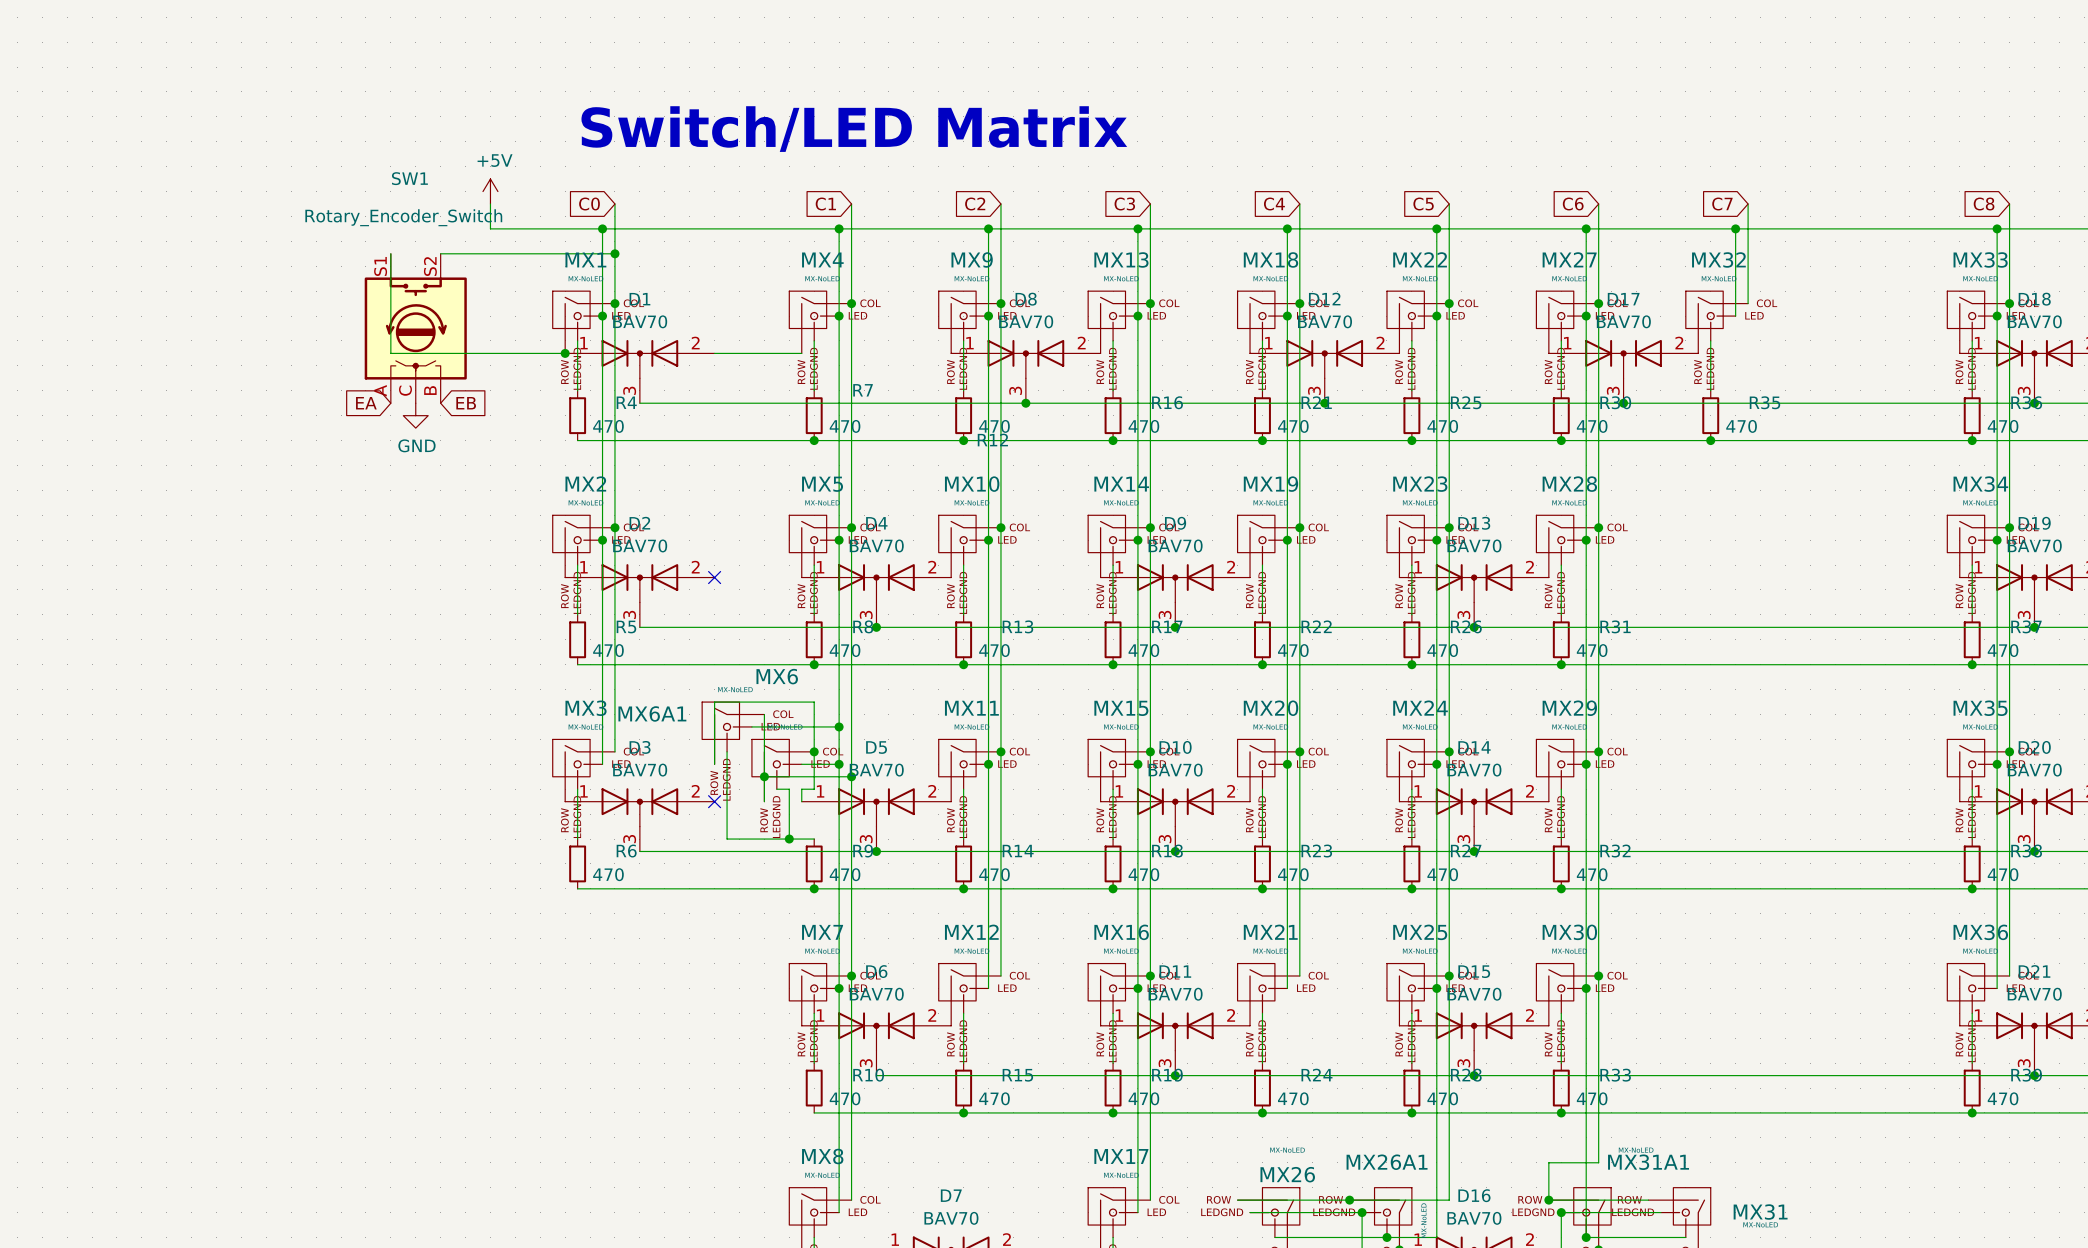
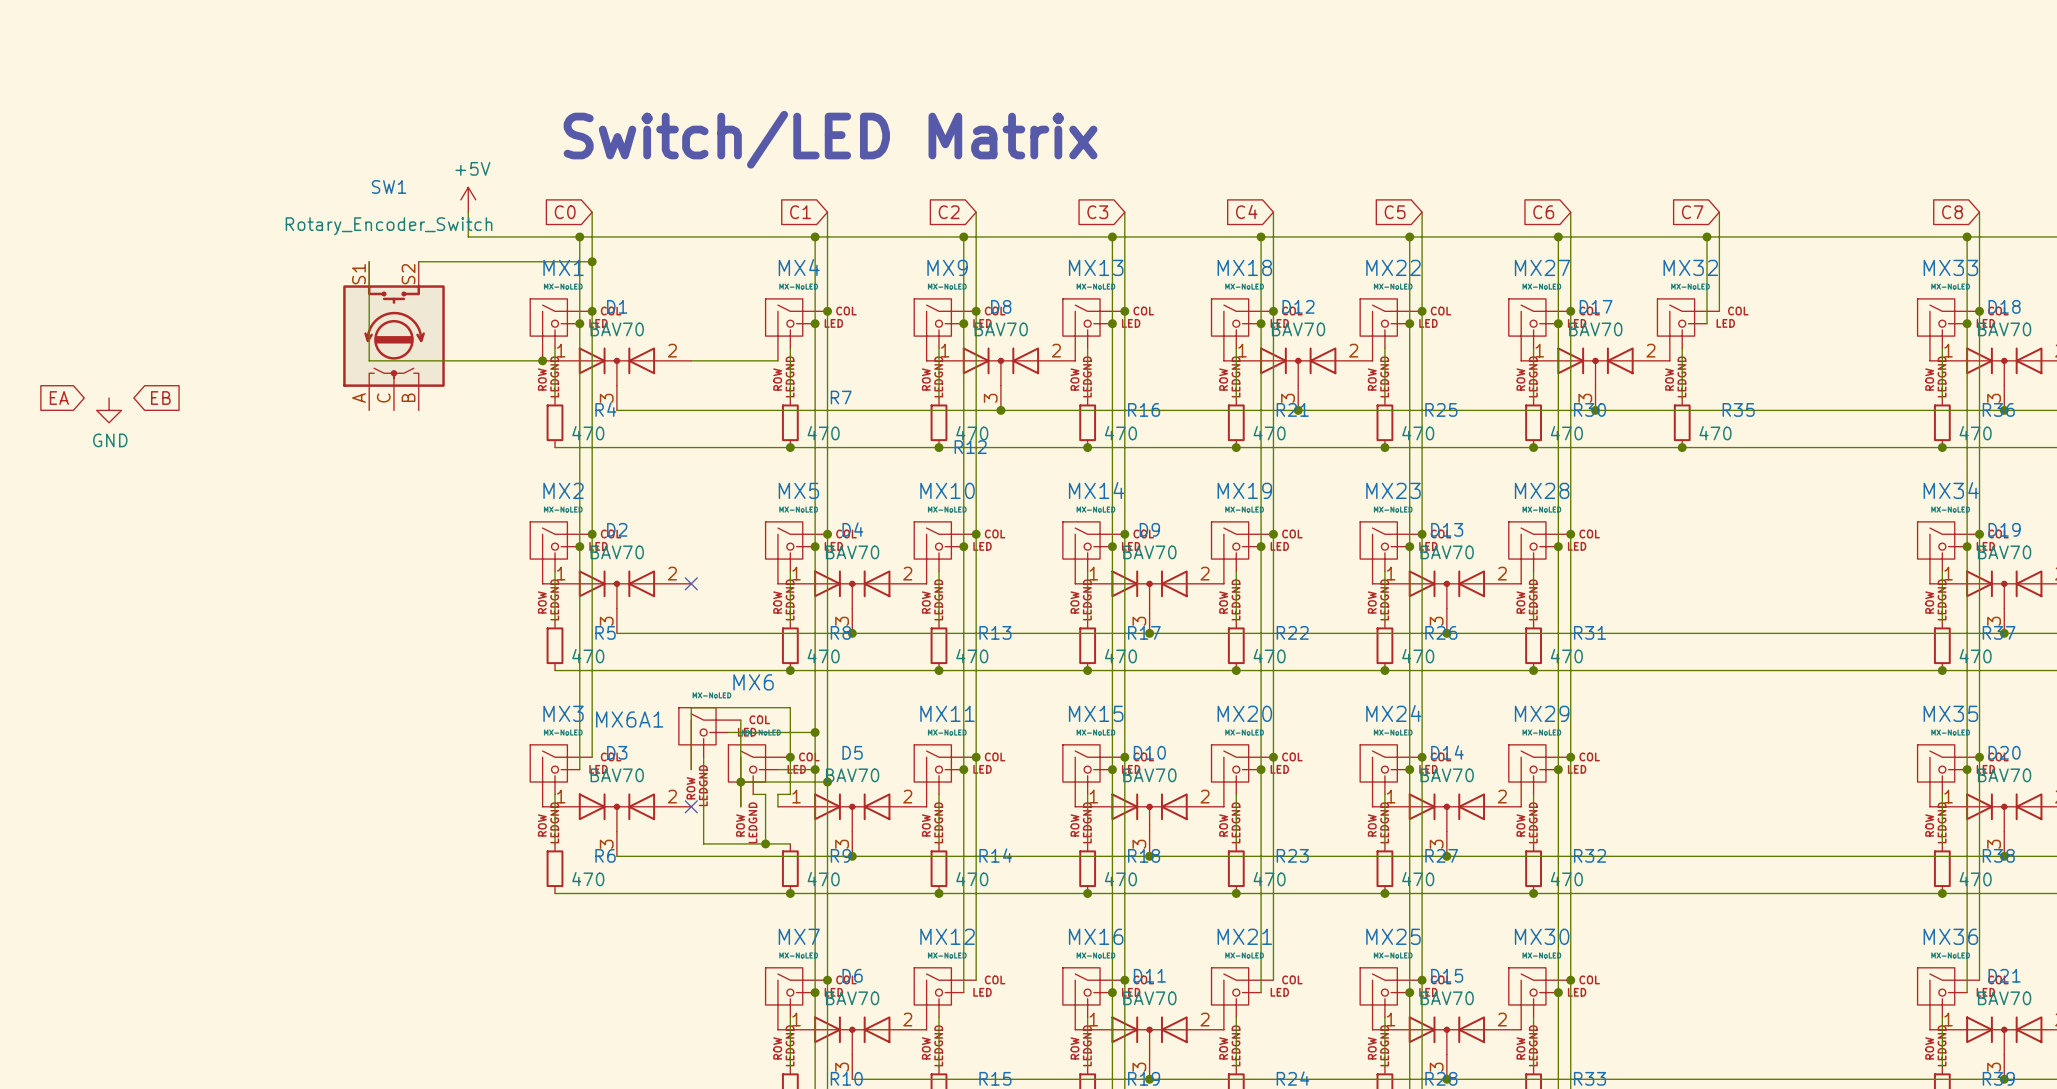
global label: none -> EA (59, 398)
global label: none -> EB (160, 398)
power symbol: none -> GND (109, 410)
global label: EA (366, 403) -> none
global label: EB (466, 403) -> none
power symbol: GND (415, 415) -> none

